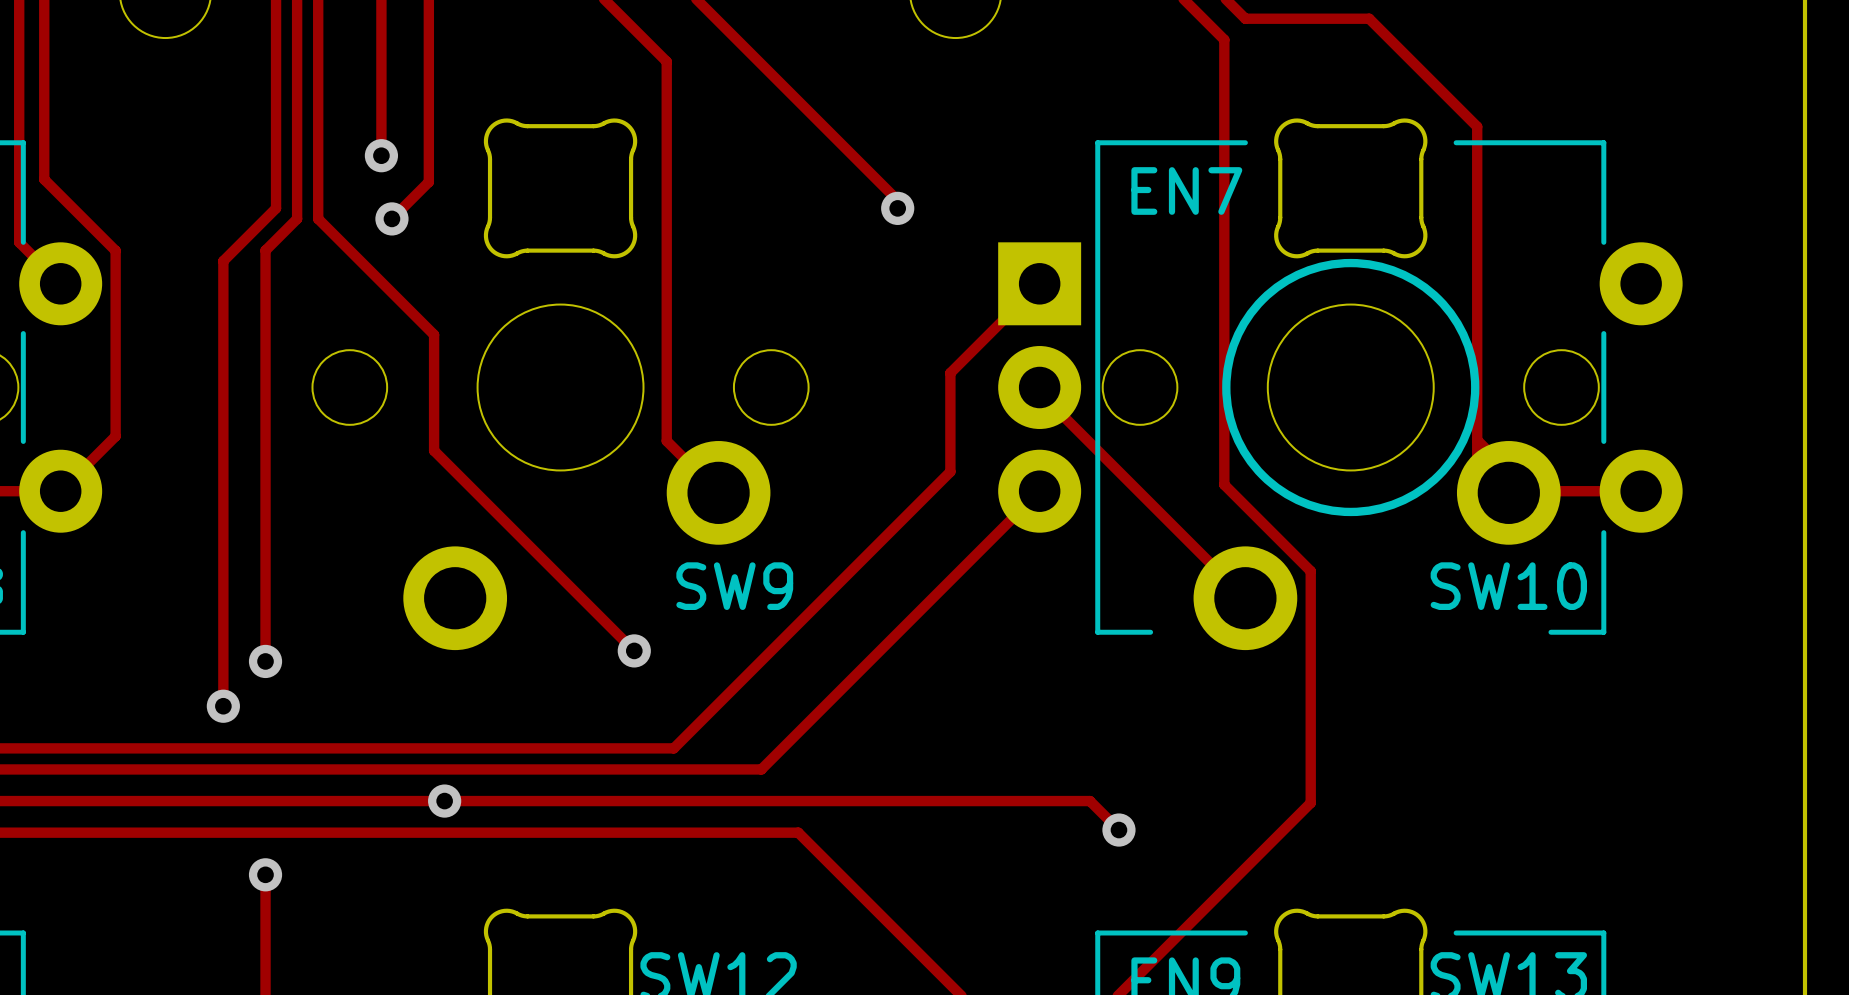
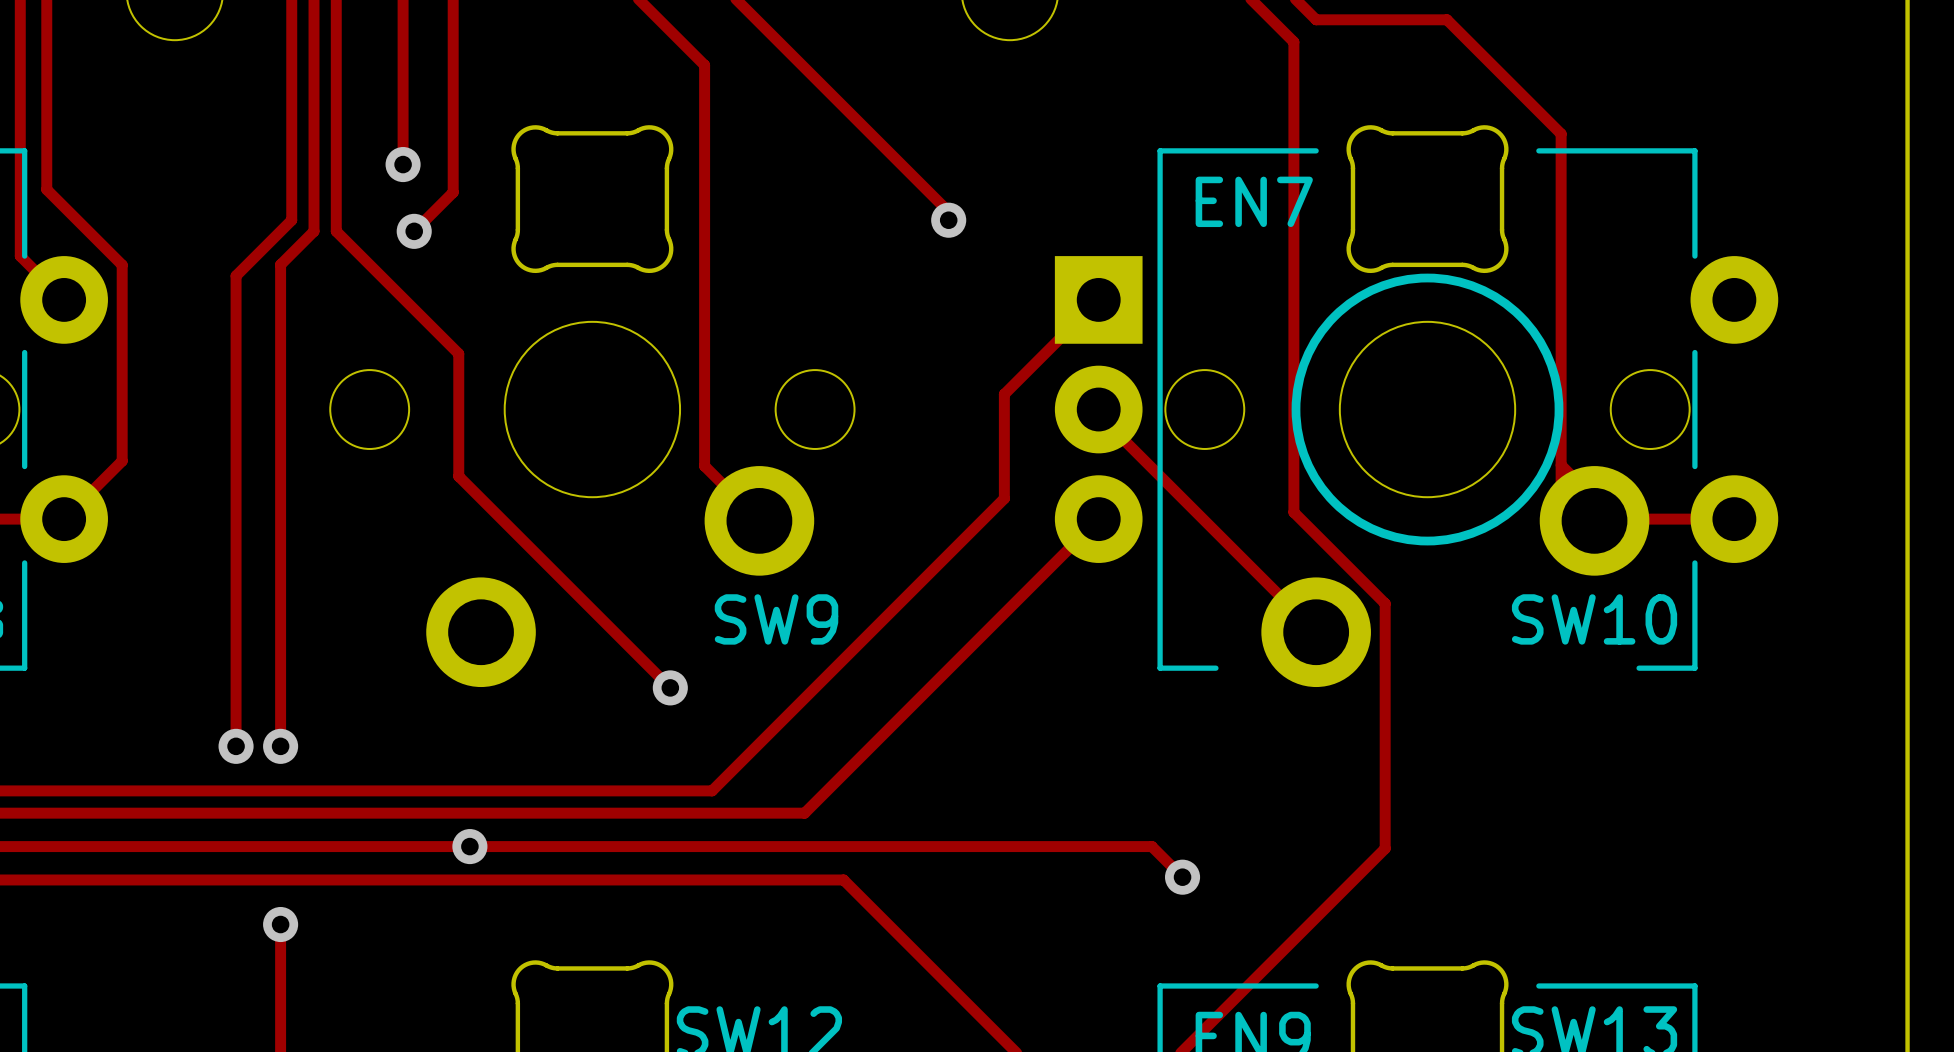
track: none -> (280, 699) (280, 746)
via position: (265, 661) -> (280, 746)

